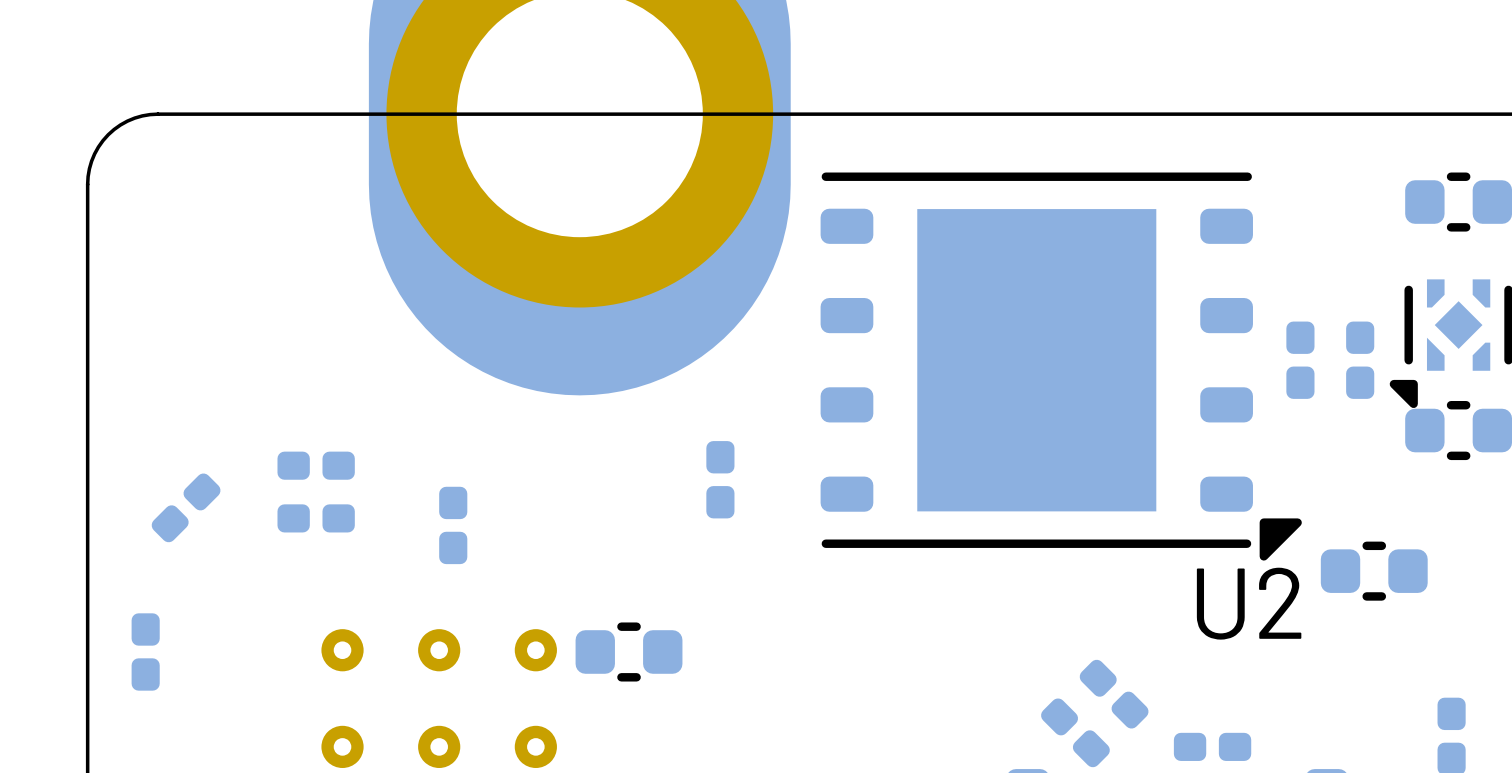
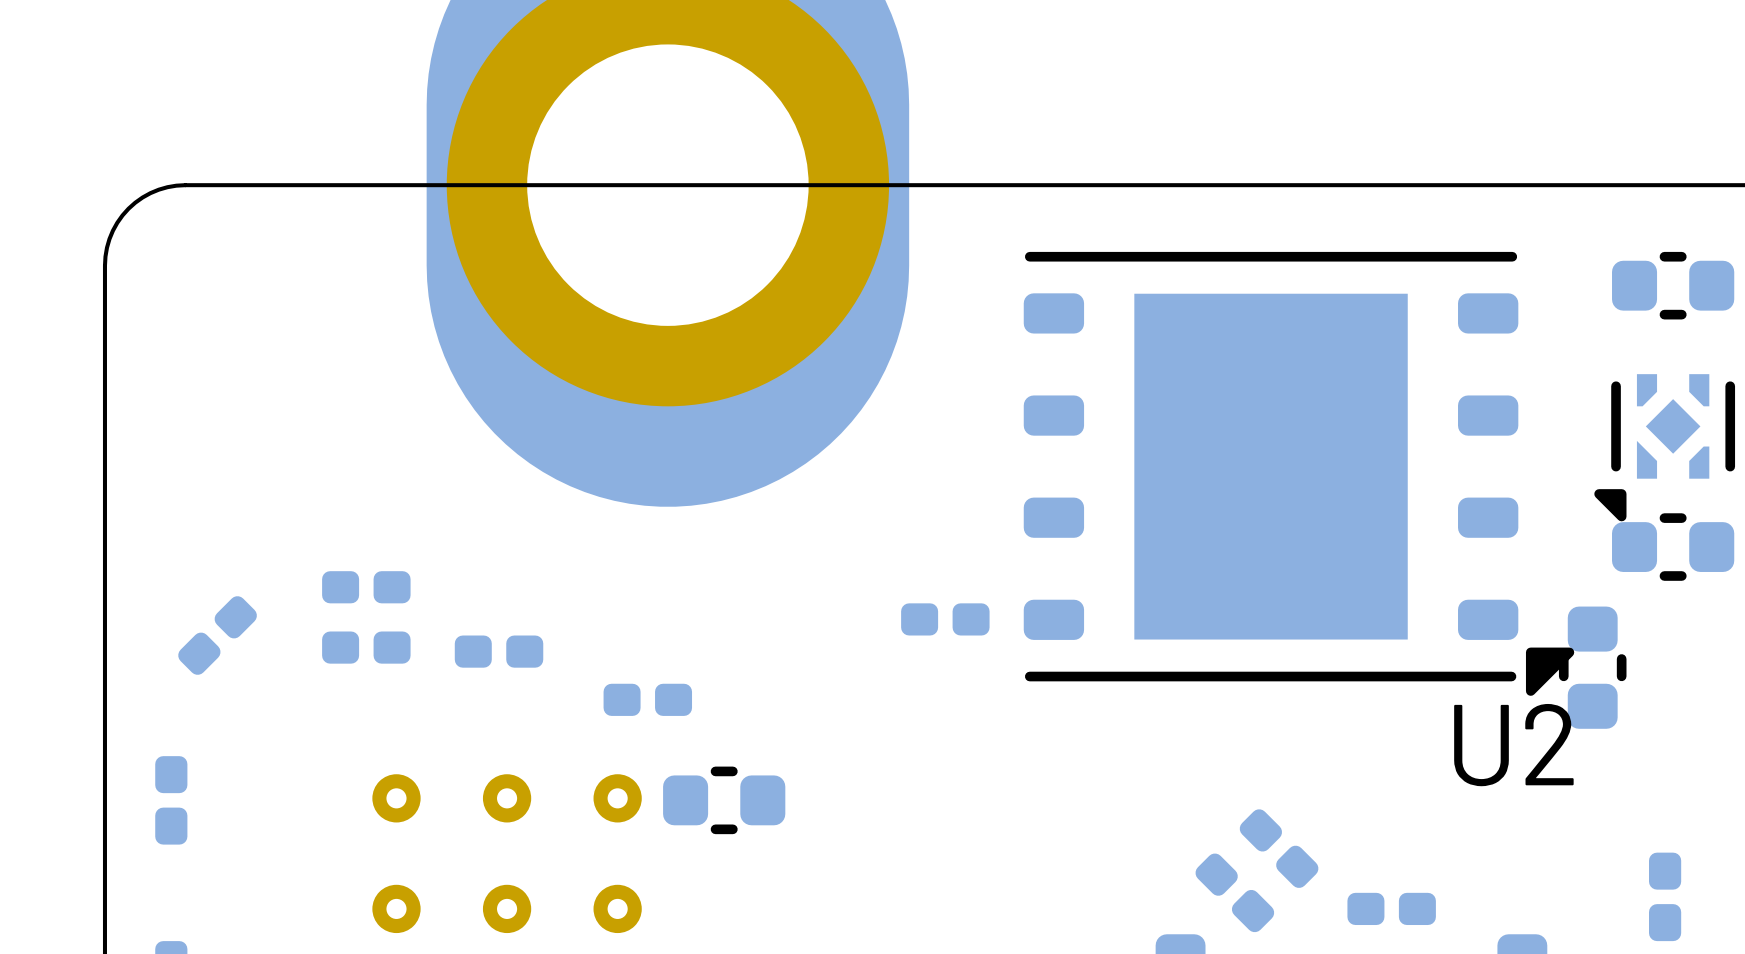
part: (1300, 360) -> none
part: (1360, 360) -> none
U2 position: (1061, 366) -> (1298, 473)
part: (720, 479) -> none
part: none -> (945, 619)
part rotation: 0° (453, 525) -> 90° clockwise (499, 651)
part: none -> (647, 699)
part rotation: 0° (1374, 571) -> 90° clockwise (1592, 667)

